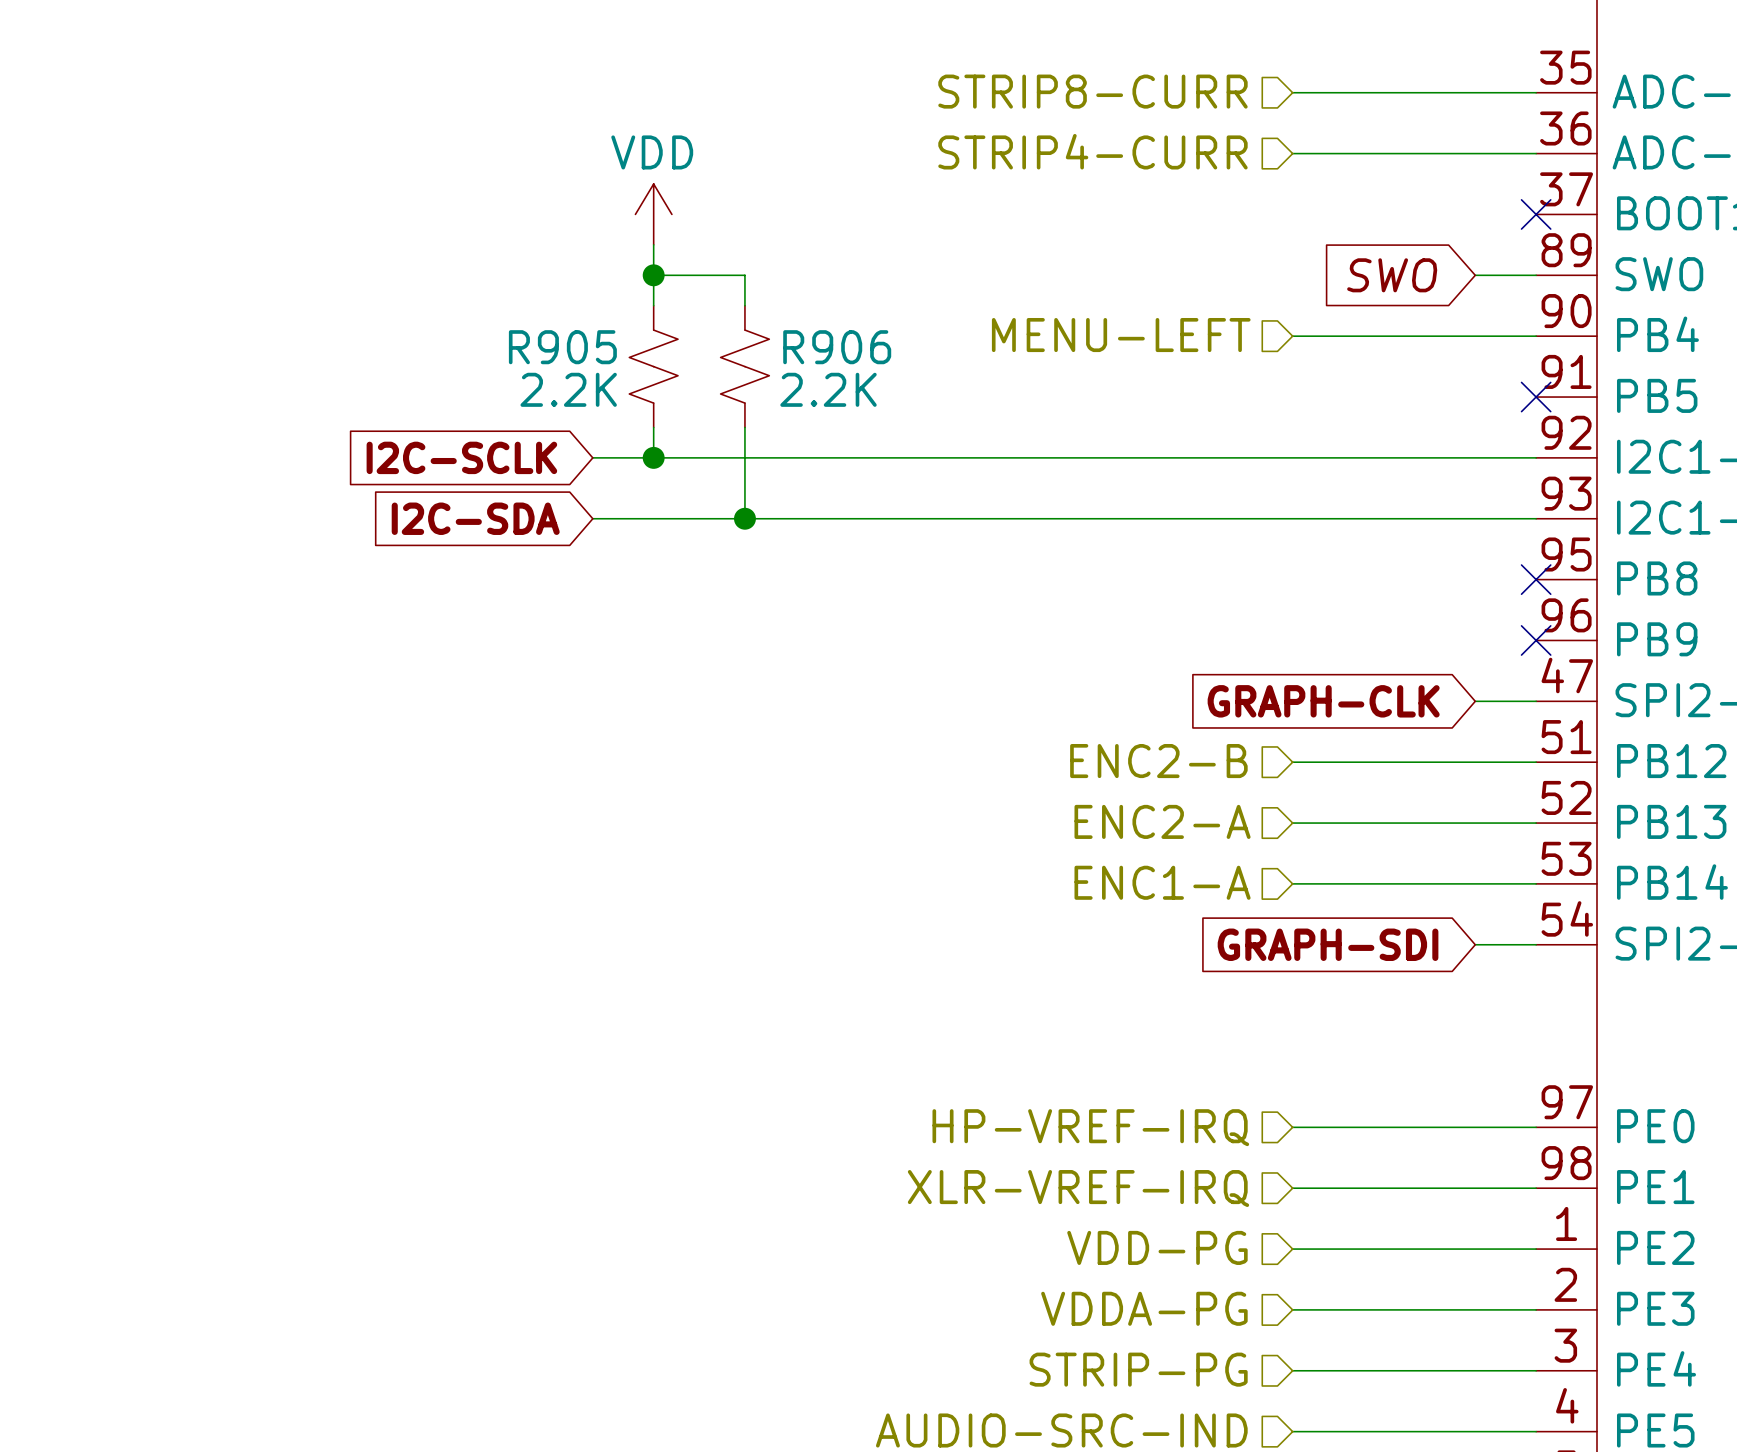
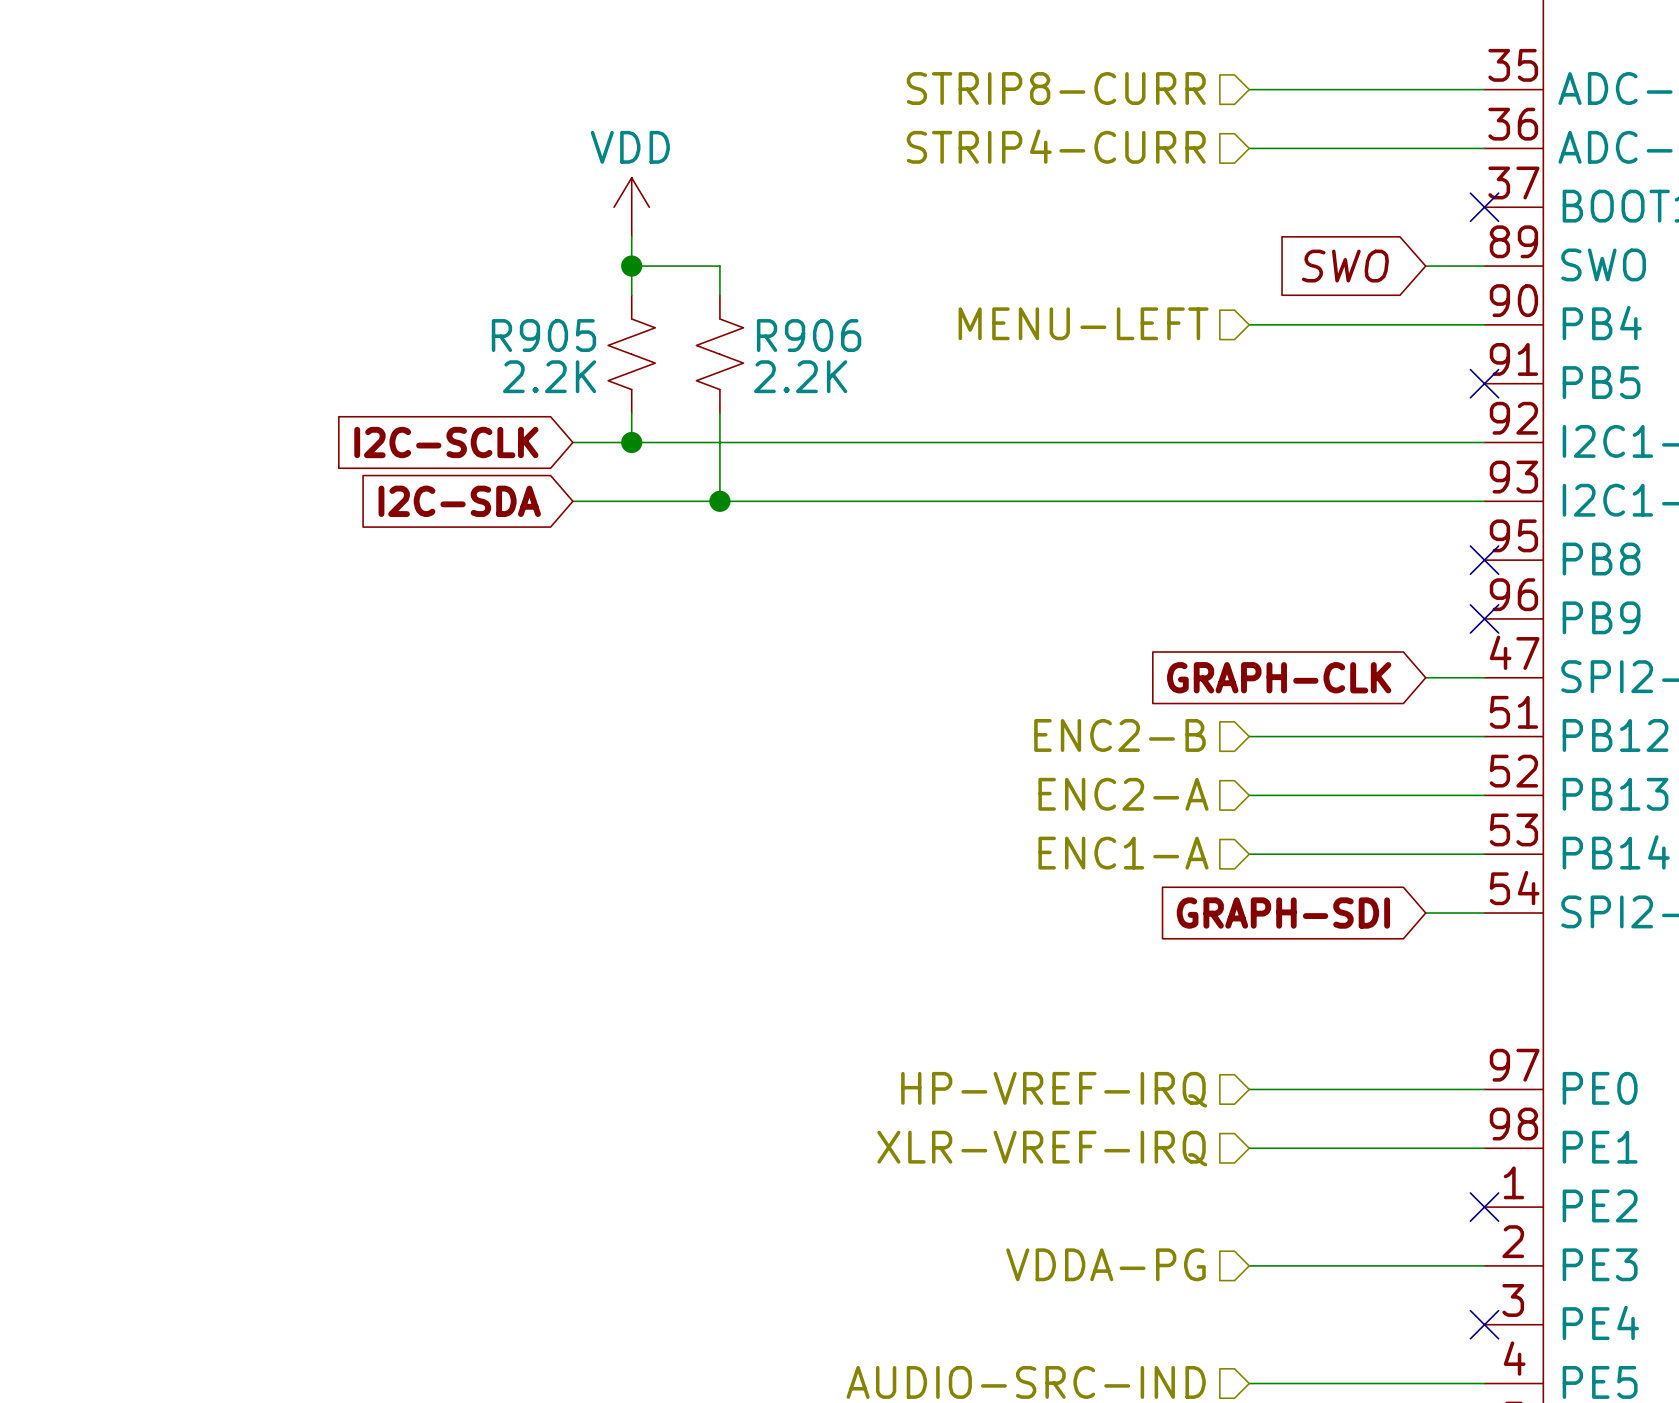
hierarchical label: VDD-PG (1157, 1247) -> none
wire: (1292, 1249) (1536, 1249) -> none
no-connect mark: none -> (1484, 1207)
hierarchical label: STRIP-PG (1138, 1369) -> none
wire: (1292, 1370) (1536, 1370) -> none
no-connect mark: none -> (1484, 1324)

